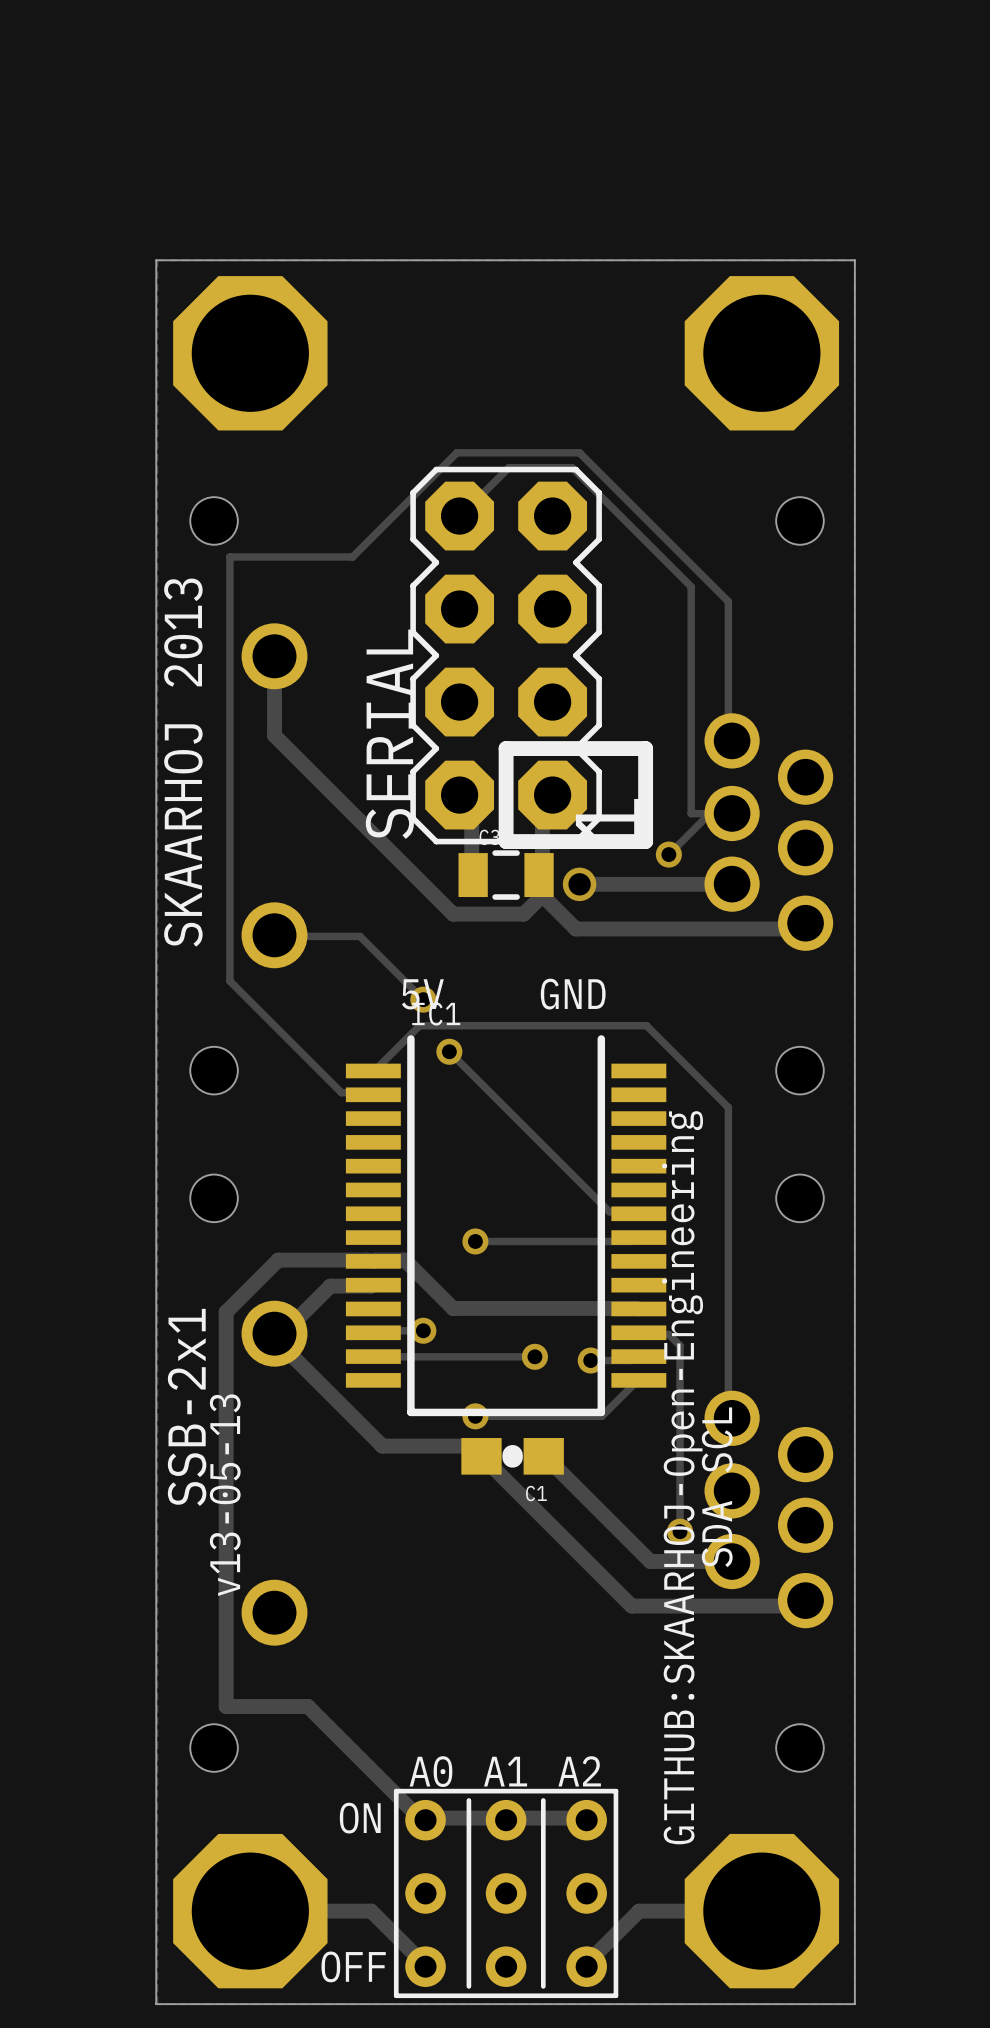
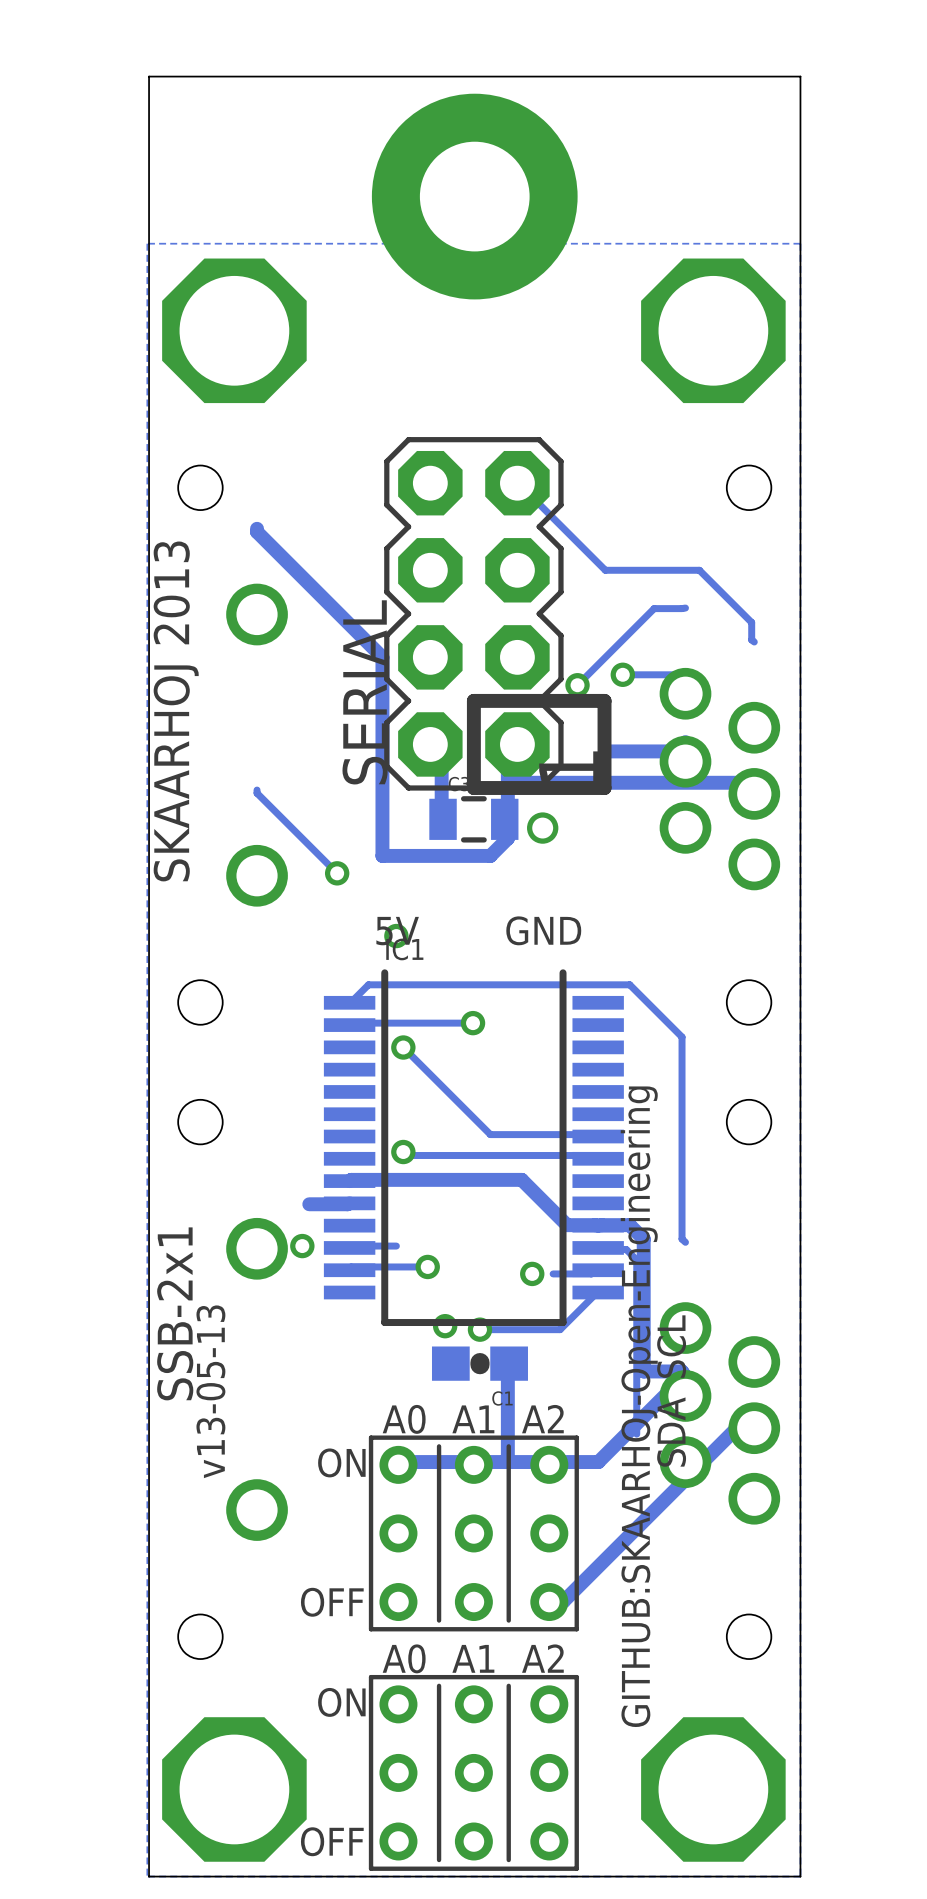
part: none -> (474, 196)
board edge: (854, 260) (156, 260) (156, 2004) (159, 2004) -> (800, 243) (800, 76) (149, 76) (149, 1876)
track: (459, 516) (508, 467) (572, 467) (691, 586) (691, 813) (732, 813) (709, 813) (668, 854) -> none
track: none -> (517, 483) (605, 570) (699, 570) (751, 622) (751, 639) (754, 642)
track: none -> (685, 608) (654, 608) (577, 685)
track: (274, 656) (274, 735) (453, 914) -> (257, 528) (257, 531) (382, 657) (382, 855) (424, 855)
track: none -> (622, 674) (685, 675)
via: none -> (622, 674)
via: none -> (577, 685)
track: (732, 740) (728, 739) (728, 601) (579, 452) (456, 452) (352, 556) (229, 556) (229, 981) (341, 1092) (371, 1092) (373, 1094) -> (473, 1023) (351, 1023) (349, 1025)
track: none -> (685, 742) (675, 751) (605, 751)
track: none -> (754, 778) (748, 782) (507, 782)
track: none -> (257, 790) (257, 793) (337, 873)
via: (668, 854) -> none
track: (732, 884) (579, 884) -> none
track: (542, 895) (575, 928) (799, 928) (805, 923) -> none
via: none -> (337, 873)
track: (274, 935) (360, 936) (423, 999) -> none
track: (449, 1051) (609, 1211) -> (403, 1047) (490, 1134) (570, 1134)
via: (449, 1051) -> none
track: (672, 1051) (646, 1025) (419, 1025) (393, 1051) -> (629, 984) (368, 984)
via: none -> (473, 1023)
via: none -> (403, 1047)
track: (638, 1237) (631, 1241) (475, 1241) -> (598, 1158) (594, 1155) (406, 1155) (403, 1152)
via position: (475, 1241) -> (403, 1152)
track: (404, 1260) (453, 1308) (605, 1308) -> (378, 1179) (521, 1179) (567, 1225)
track: (373, 1261) (278, 1260) (226, 1312) (226, 1706) (308, 1706) (419, 1818) (425, 1820) (427, 1818) (501, 1818) (506, 1820) (508, 1818) (583, 1818) (586, 1820) -> none
track: (330, 1286) (281, 1334) (270, 1334) (382, 1446) (471, 1446) (631, 1606) (799, 1606) (805, 1600) -> none
track: none -> (598, 1225) (629, 1225) (643, 1239) (643, 1371) (682, 1371) (685, 1376) (598, 1462) (553, 1462) (549, 1464) (546, 1462) (476, 1462) (473, 1464) (469, 1462) (399, 1462) (398, 1464)
track: (728, 1323) (728, 1416) (732, 1418) -> (682, 1239) (685, 1242)
via: none -> (302, 1246)
via: (423, 1330) -> none
via: none -> (427, 1266)
track: (534, 1356) (373, 1356) -> (427, 1266) (351, 1266) (349, 1270)
via: (534, 1356) -> none
via position: (590, 1360) -> (532, 1273)
track: (601, 1416) (475, 1416) -> (563, 1326) (560, 1329) (479, 1329)
via: none -> (479, 1329)
track: (543, 1456) (650, 1561) (732, 1561) -> (509, 1363) (507, 1462)
track: none -> (754, 1413) (751, 1413) (563, 1601) (549, 1602)
via: (680, 1531) -> none
part: none -> (473, 1533)
track: (250, 1911) (371, 1911) (425, 1966) -> none
track: (761, 1911) (639, 1911) (587, 1963) (586, 1966) -> none

